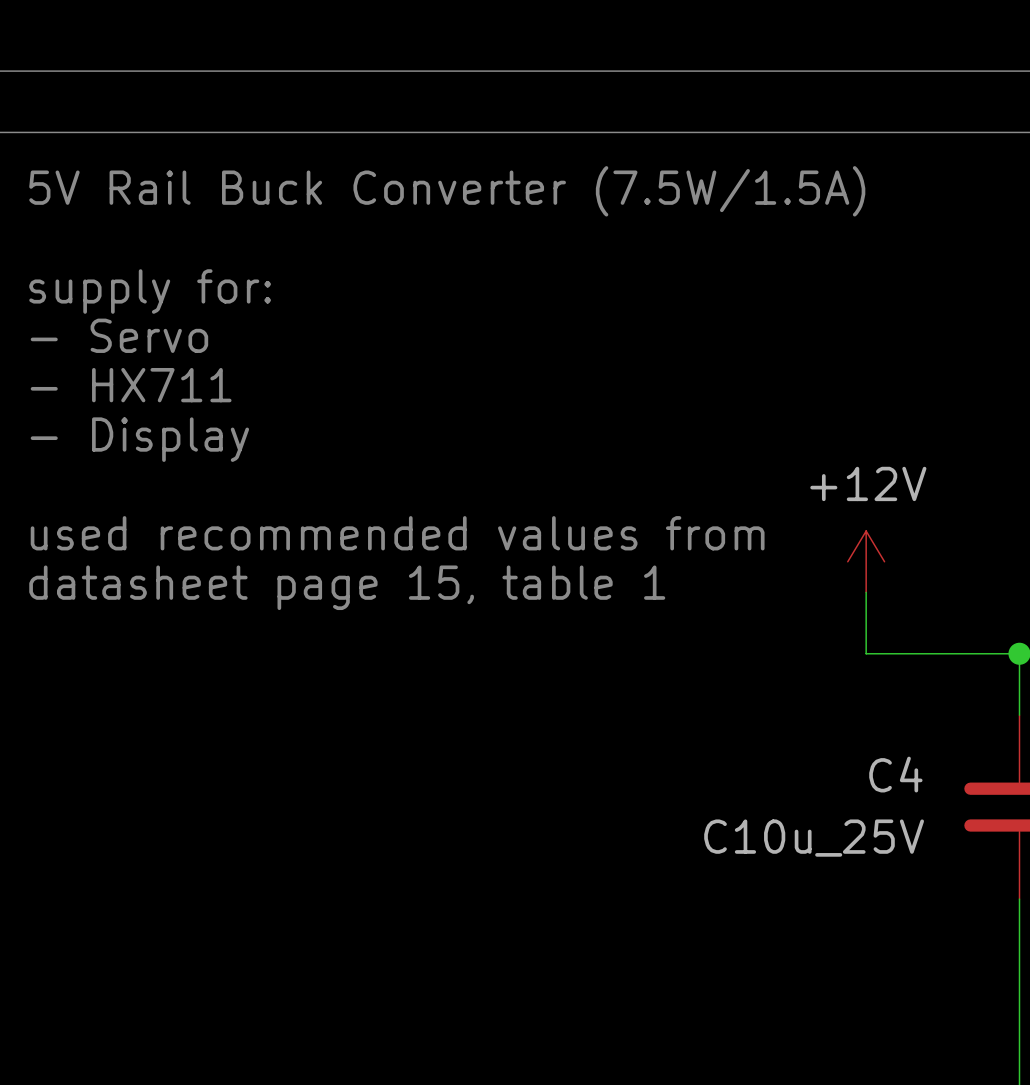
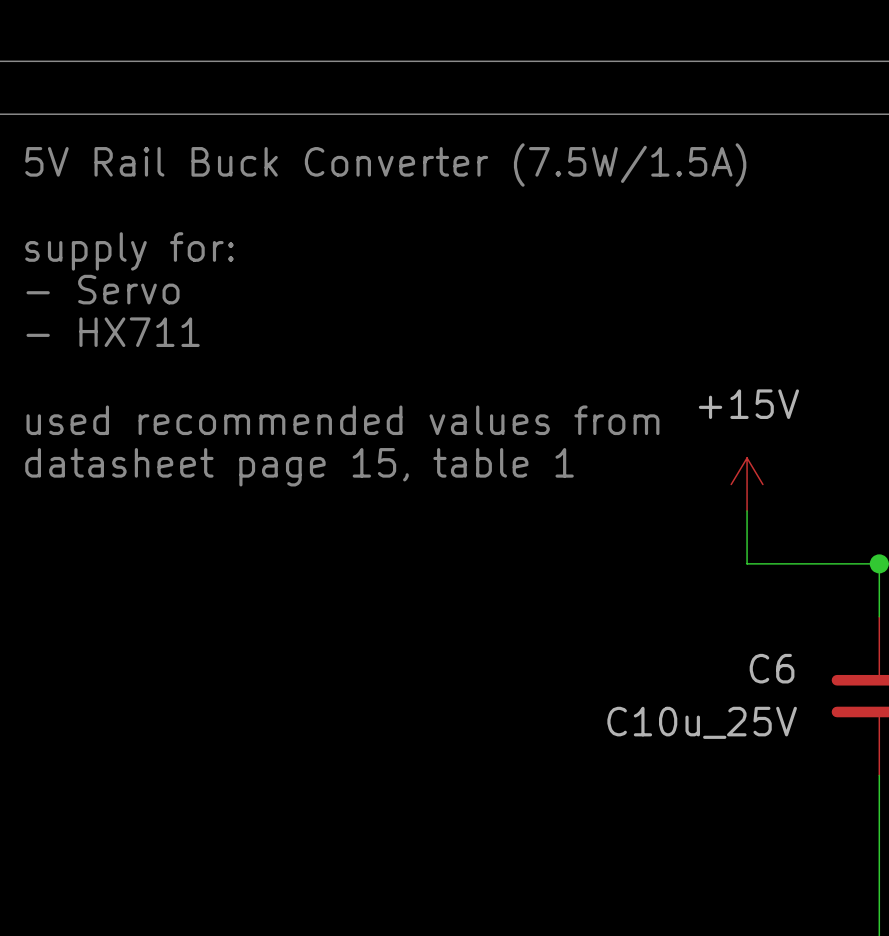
text: - Display (139, 439) -> none
text position: used recommended values from (397, 533) -> used recommended values from (342, 420)
power symbol: +12V (866, 561) -> +15V (747, 484)
text position: datasheet page 15, table 1 (347, 587) -> datasheet page 15, table 1 (299, 467)
C4 name: C4 (895, 774) -> C6 (772, 668)

